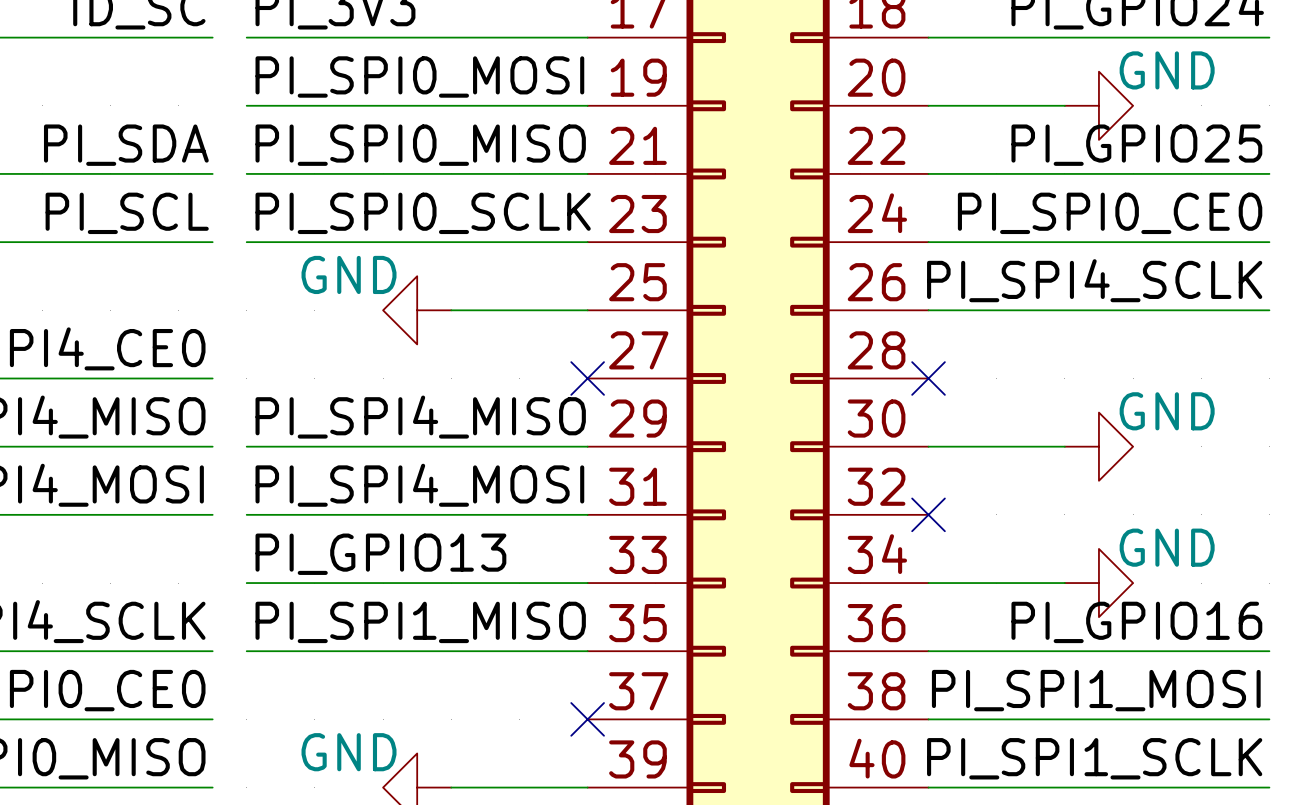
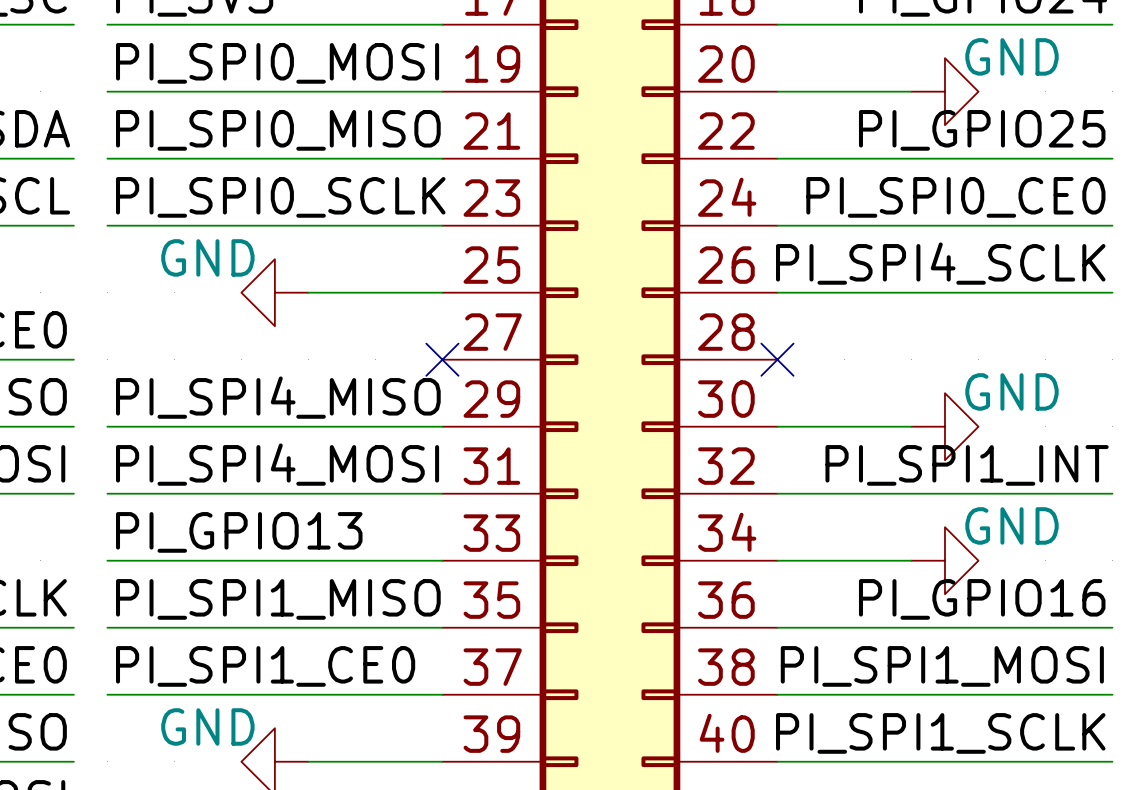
label: none -> PI_SPI1_INT (967, 465)
wire: none -> (777, 493) (1112, 493)
no-connect mark: (928, 514) -> none
label: none -> PI_SPI1_CE0 (265, 666)
wire: none -> (107, 694) (442, 694)
no-connect mark: (587, 719) -> none

